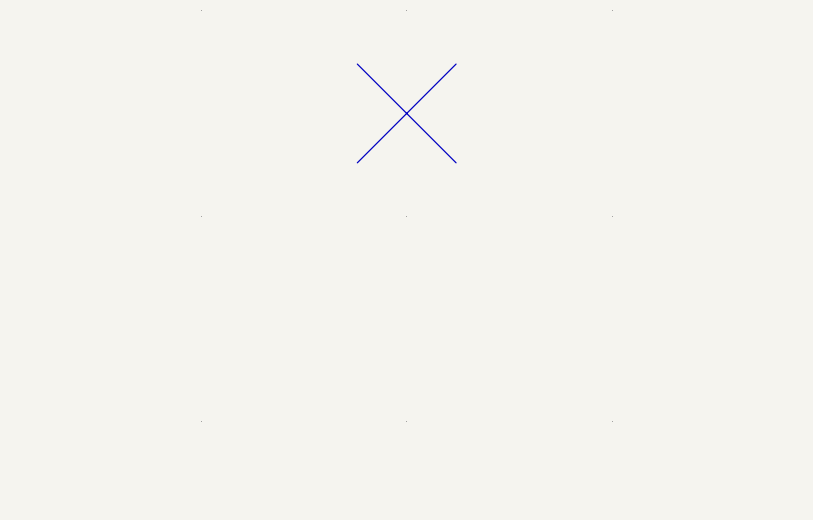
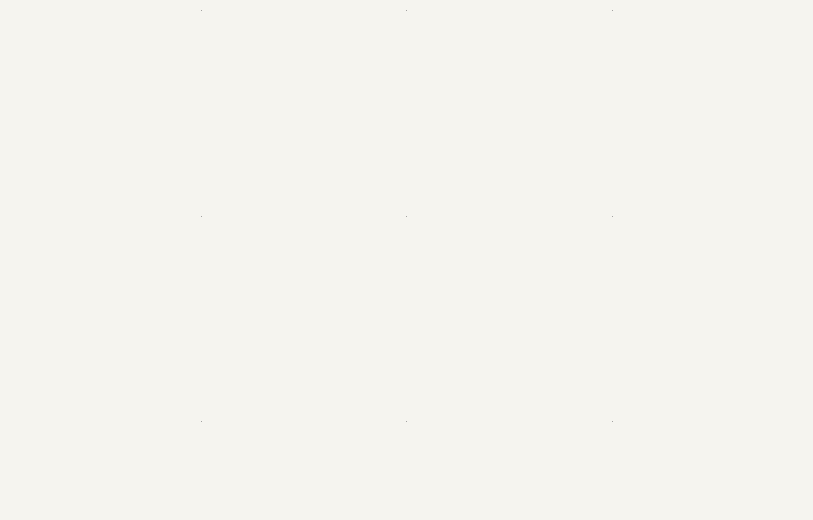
no-connect mark: (406, 113) -> none

